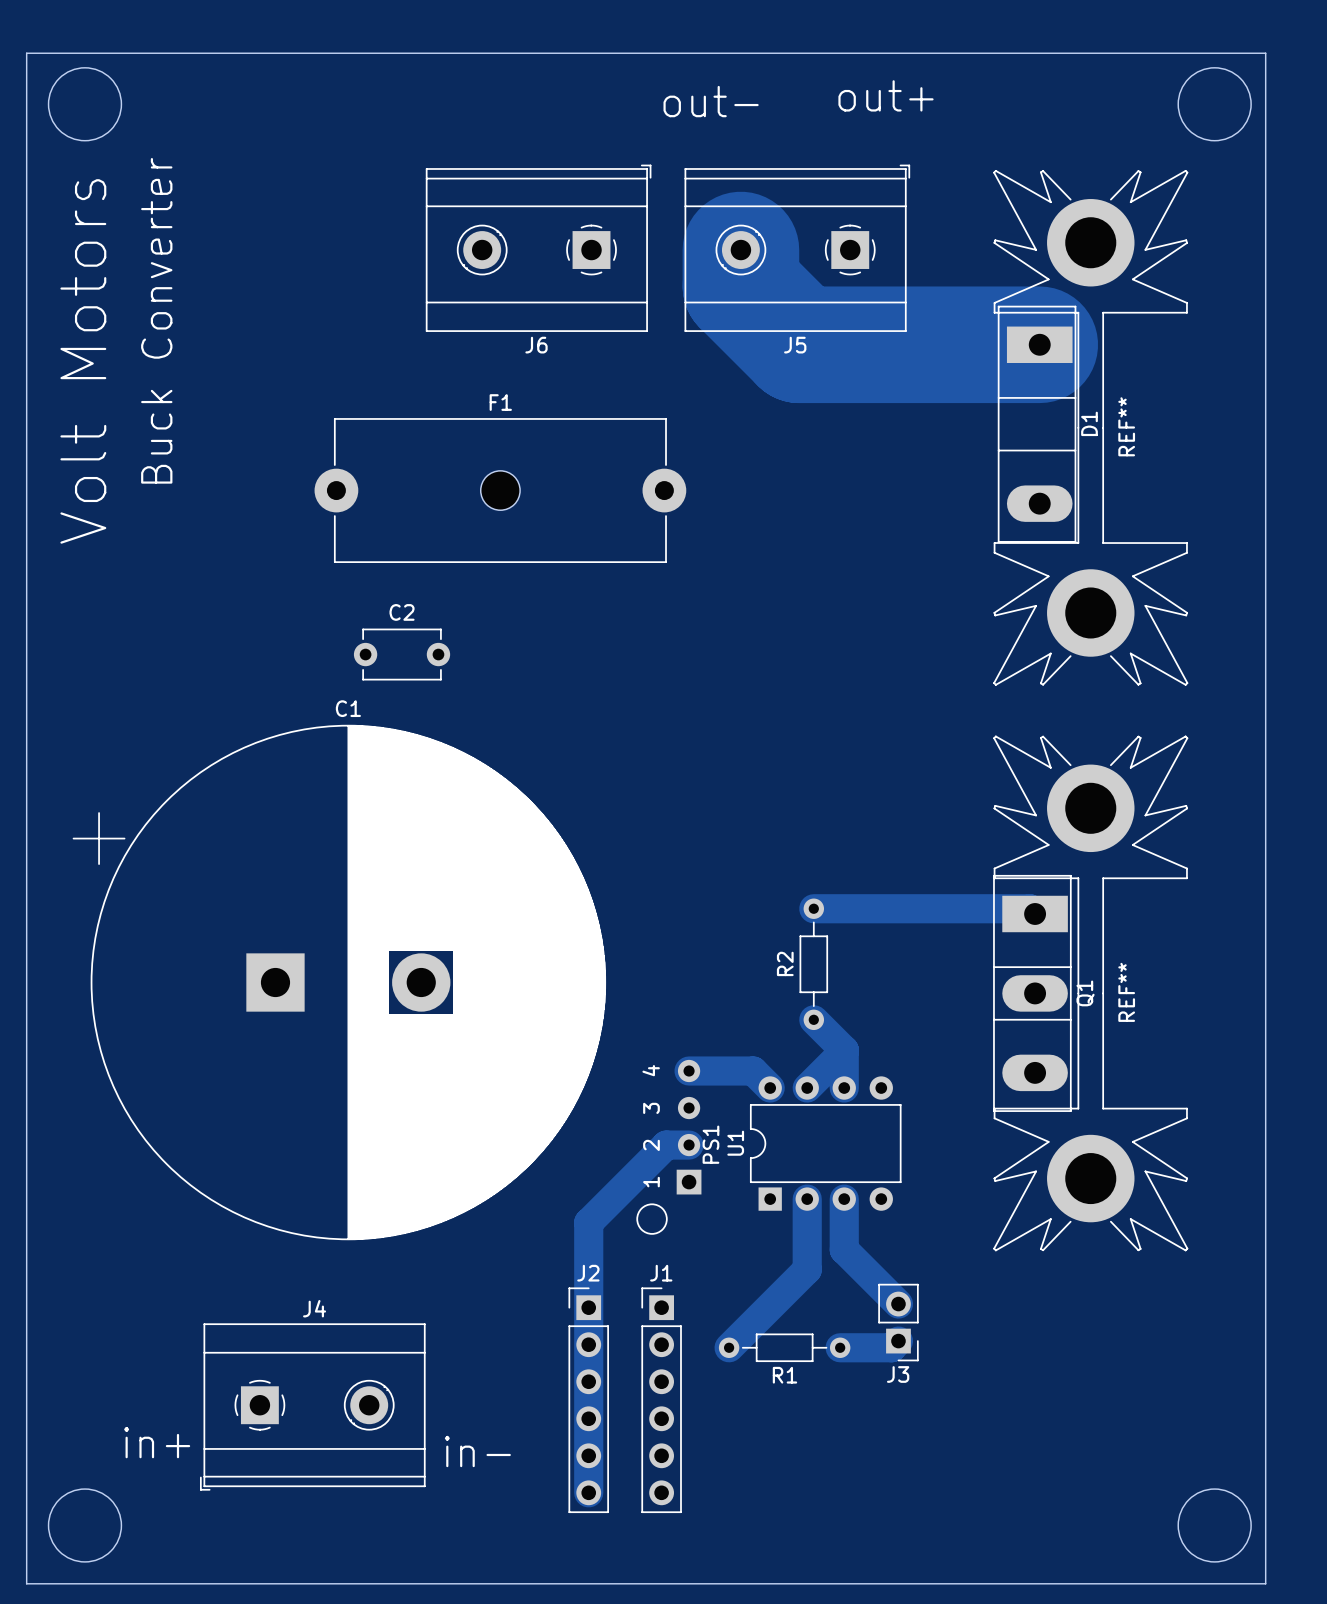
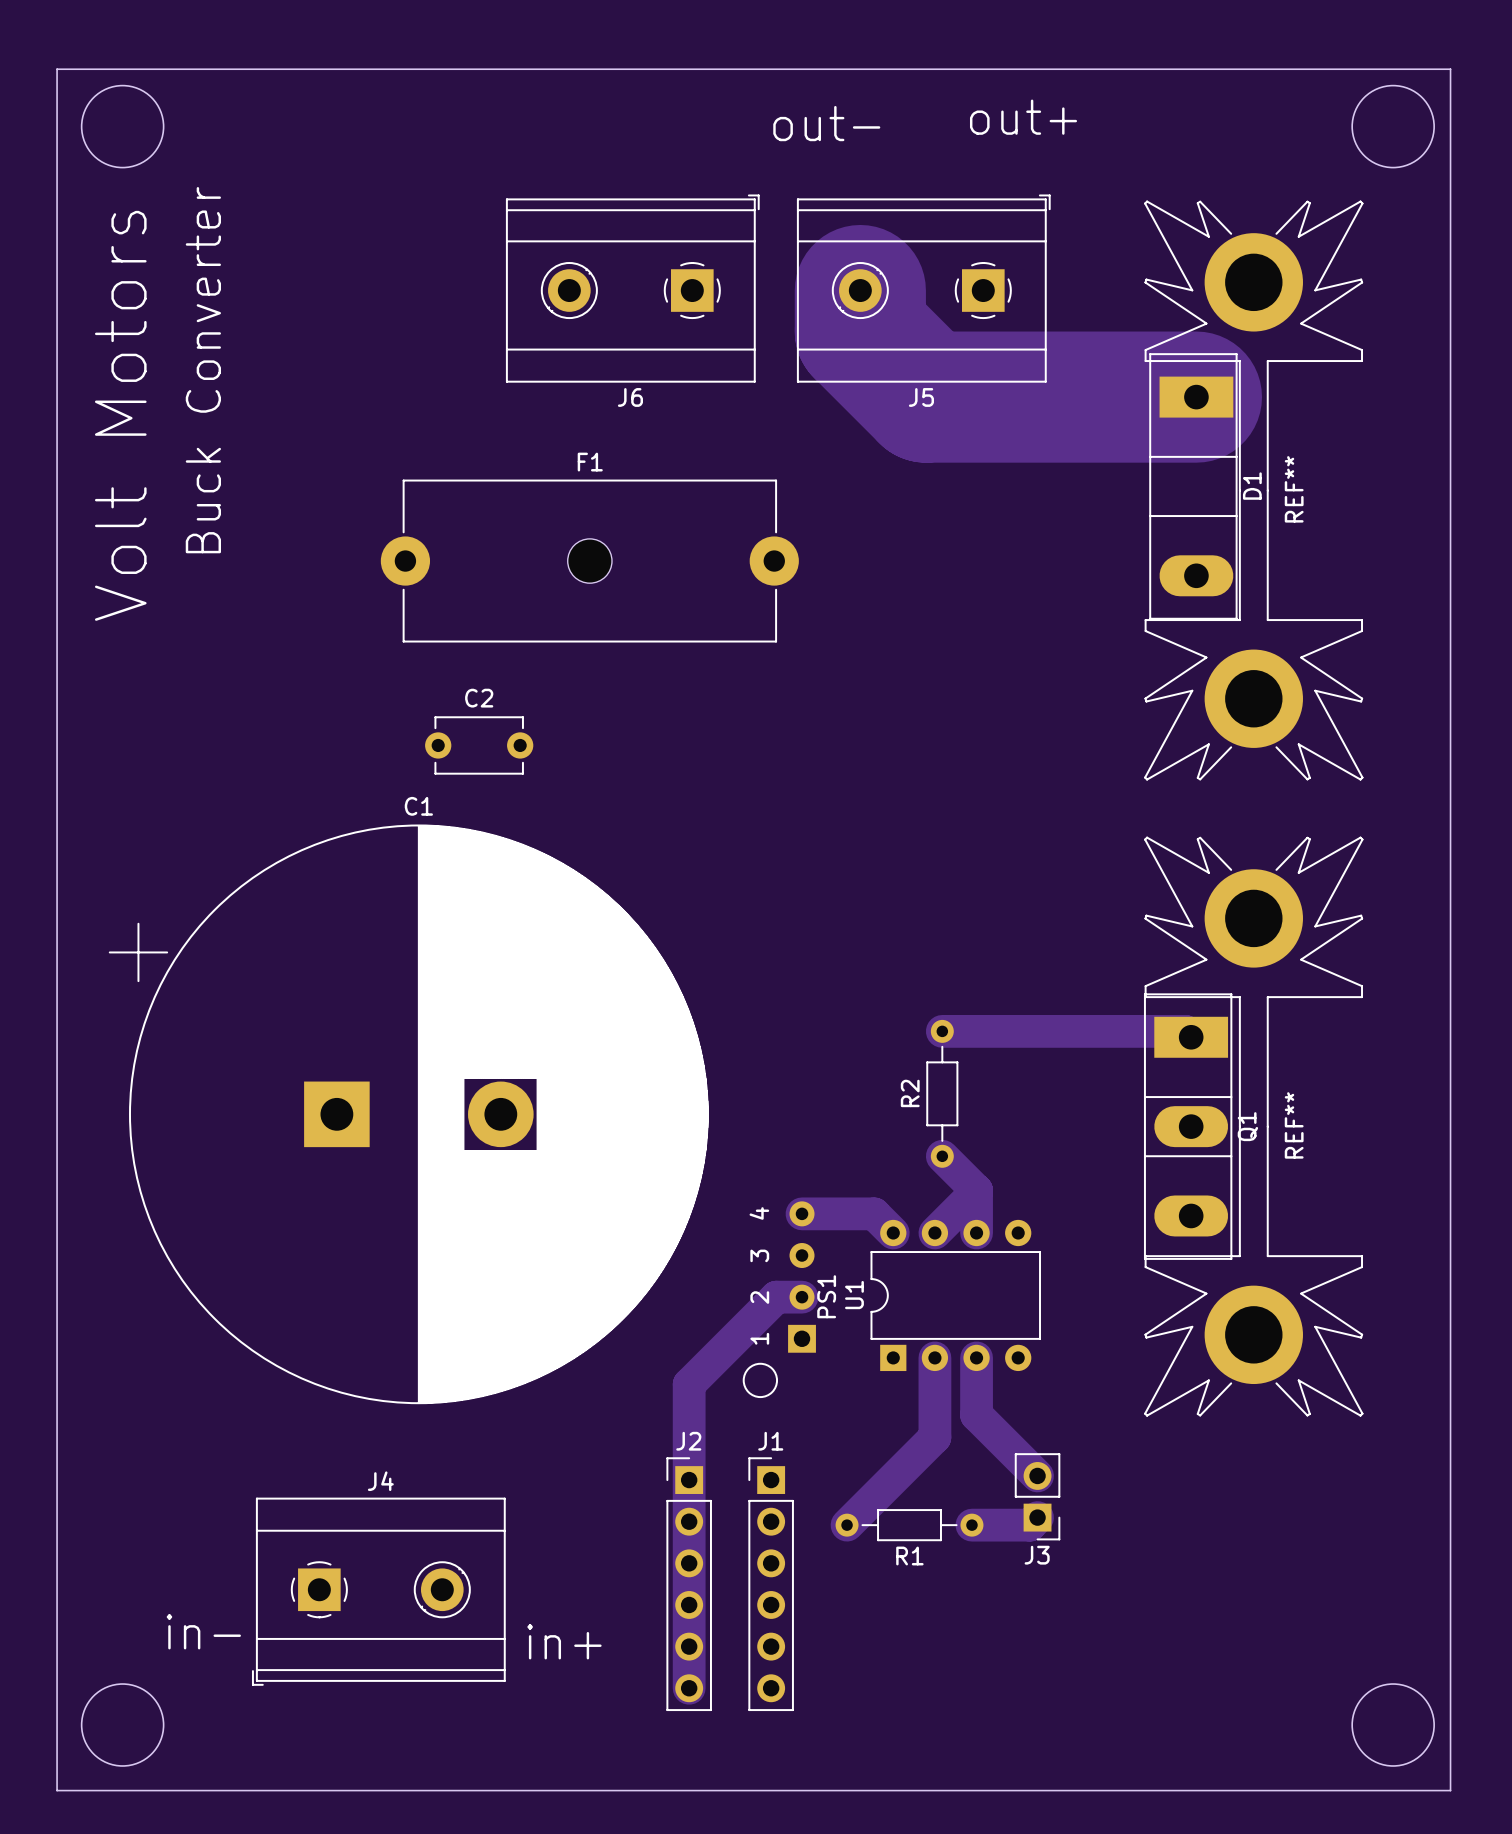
text: in+ (157, 1442) -> in- (203, 1631)
text: in- (477, 1451) -> in+ (564, 1641)

